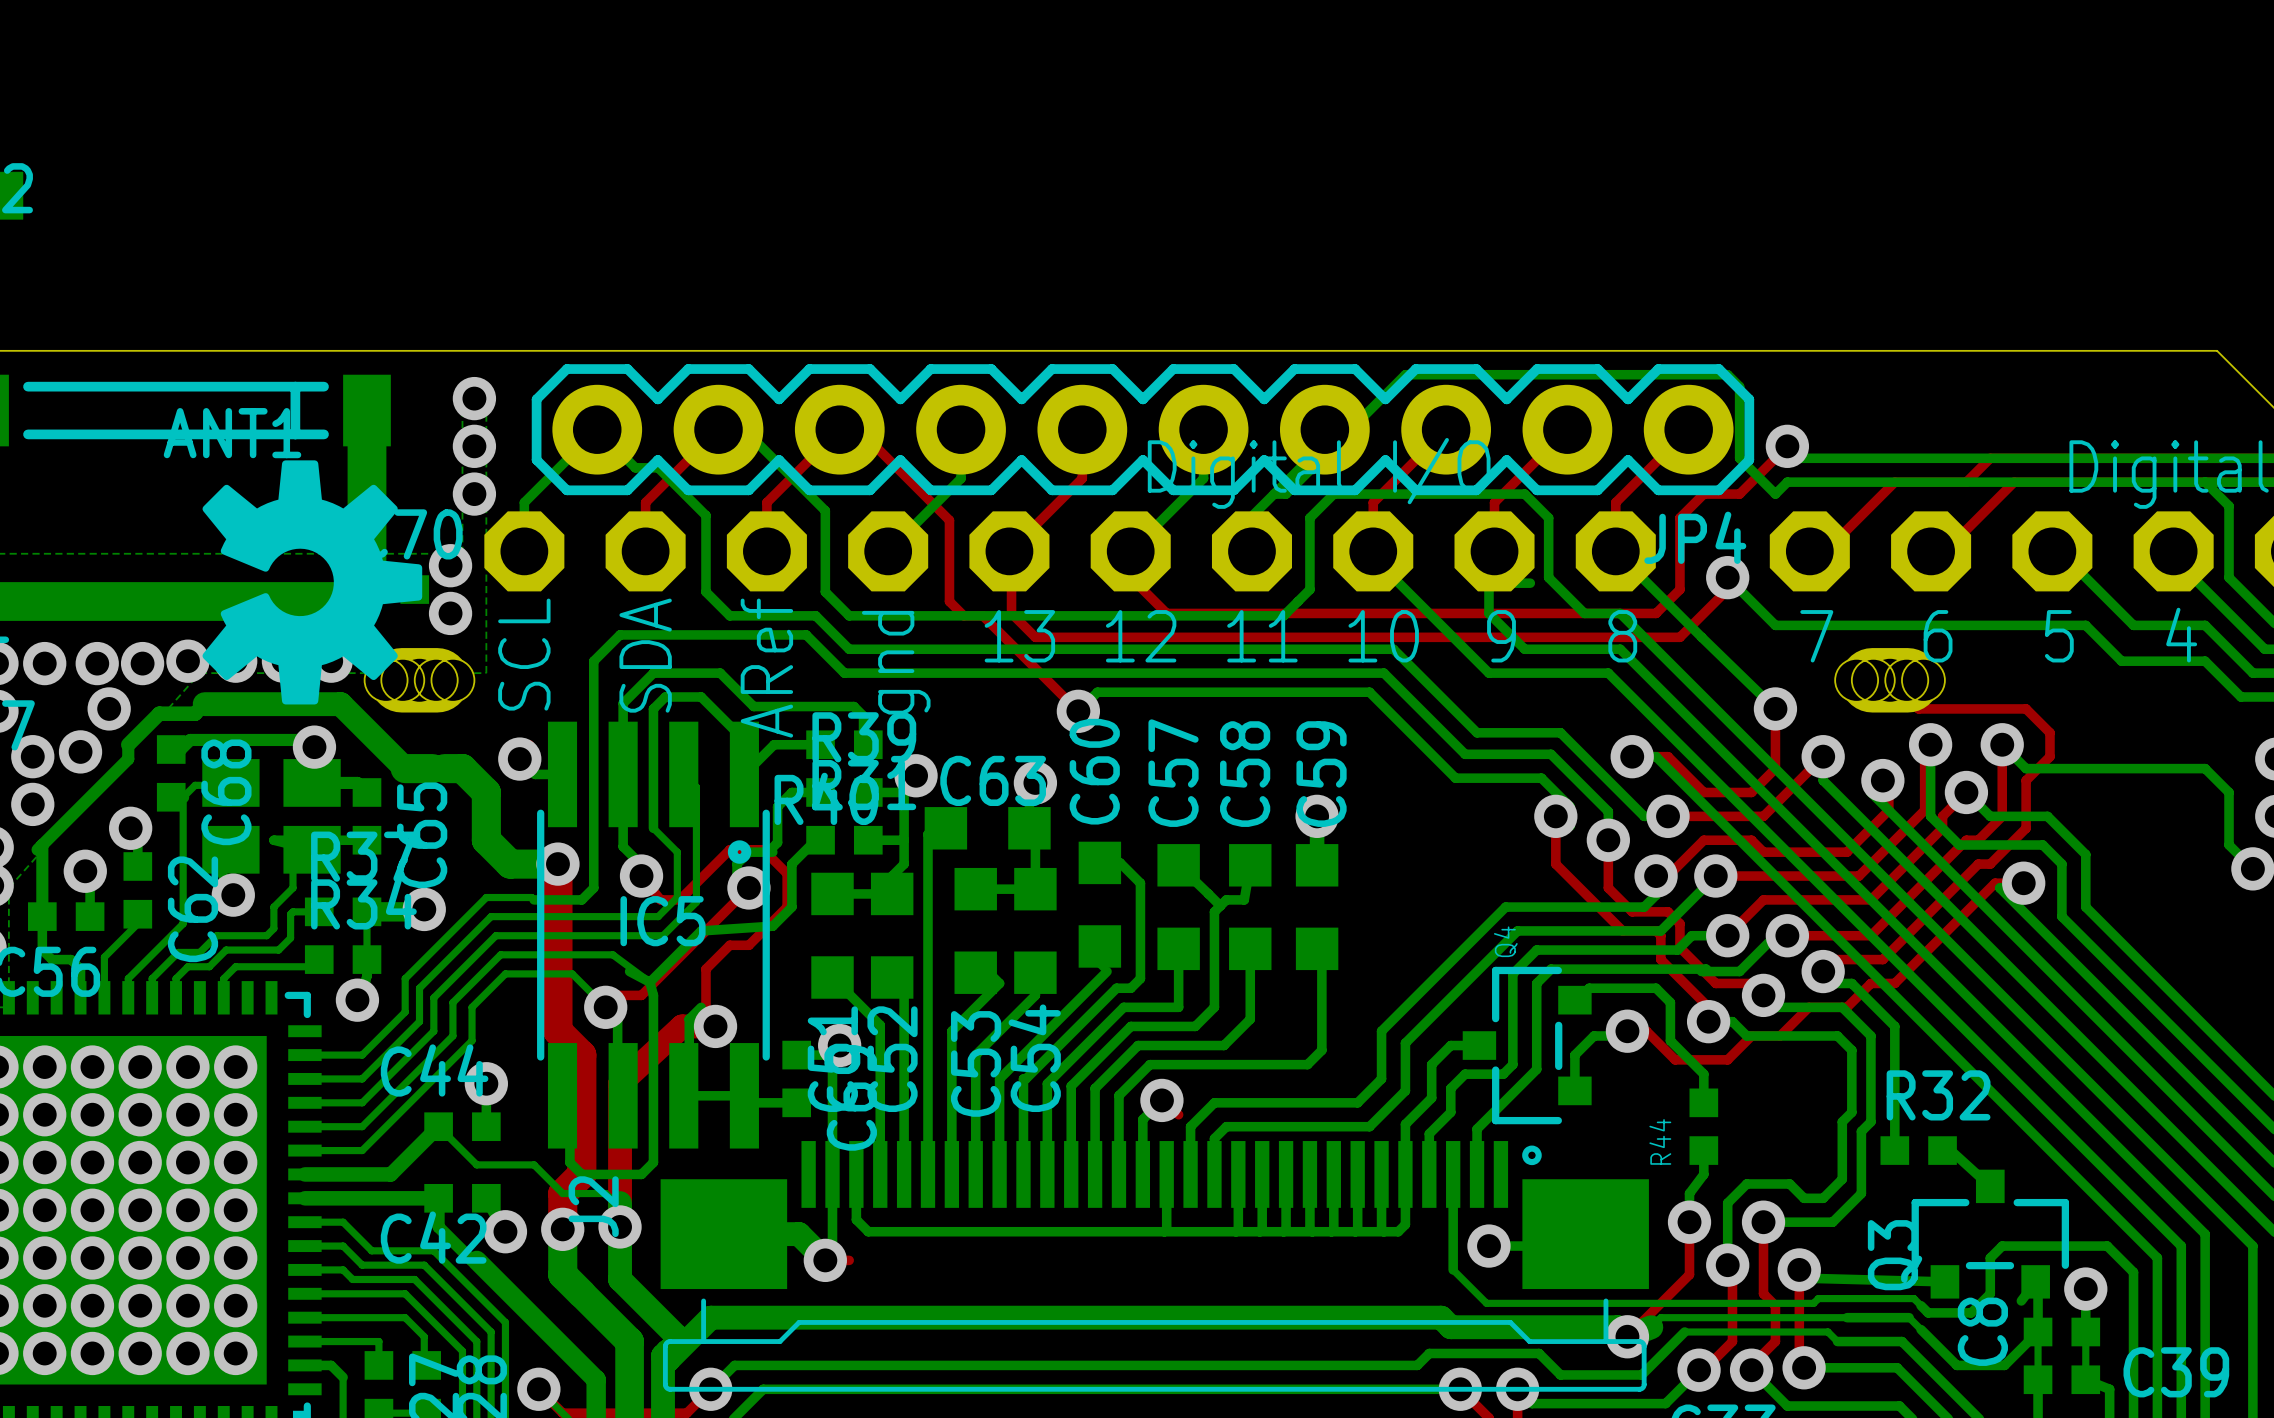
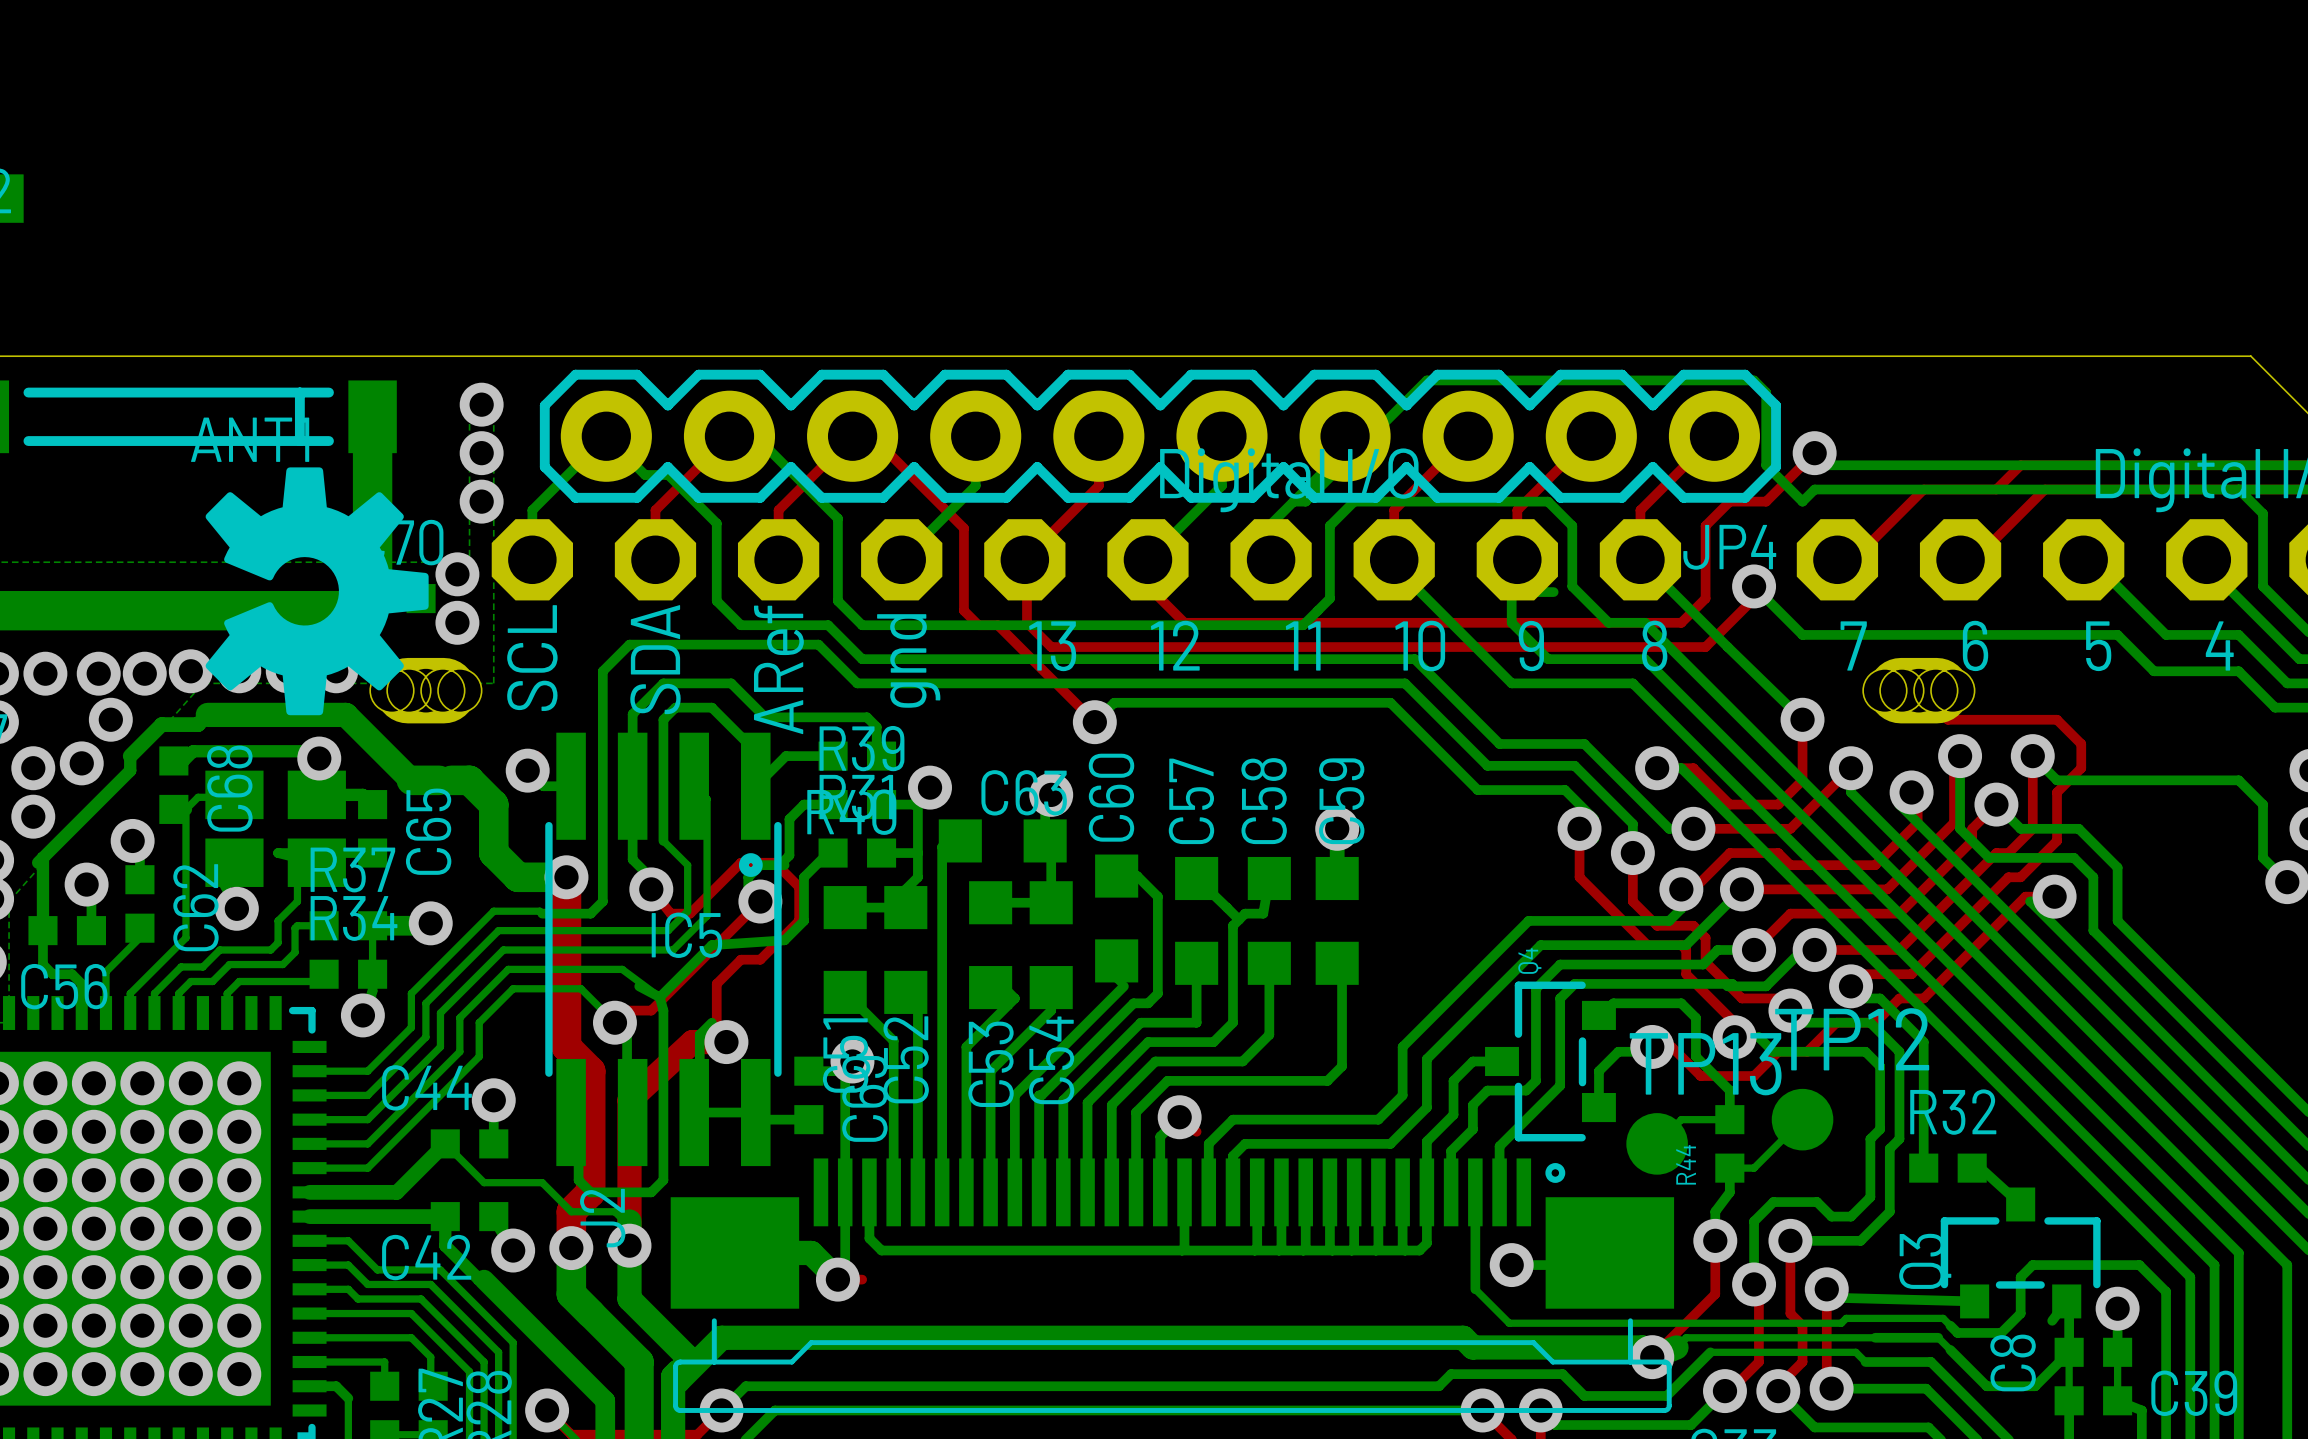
bottom track: none -> (1729, 1119) (1681, 1119) (1657, 1143)
bottom track: none -> (1802, 1119) (1754, 1168) (1729, 1168)
TP12: none -> (1802, 1119)
TP13: none -> (1657, 1143)

